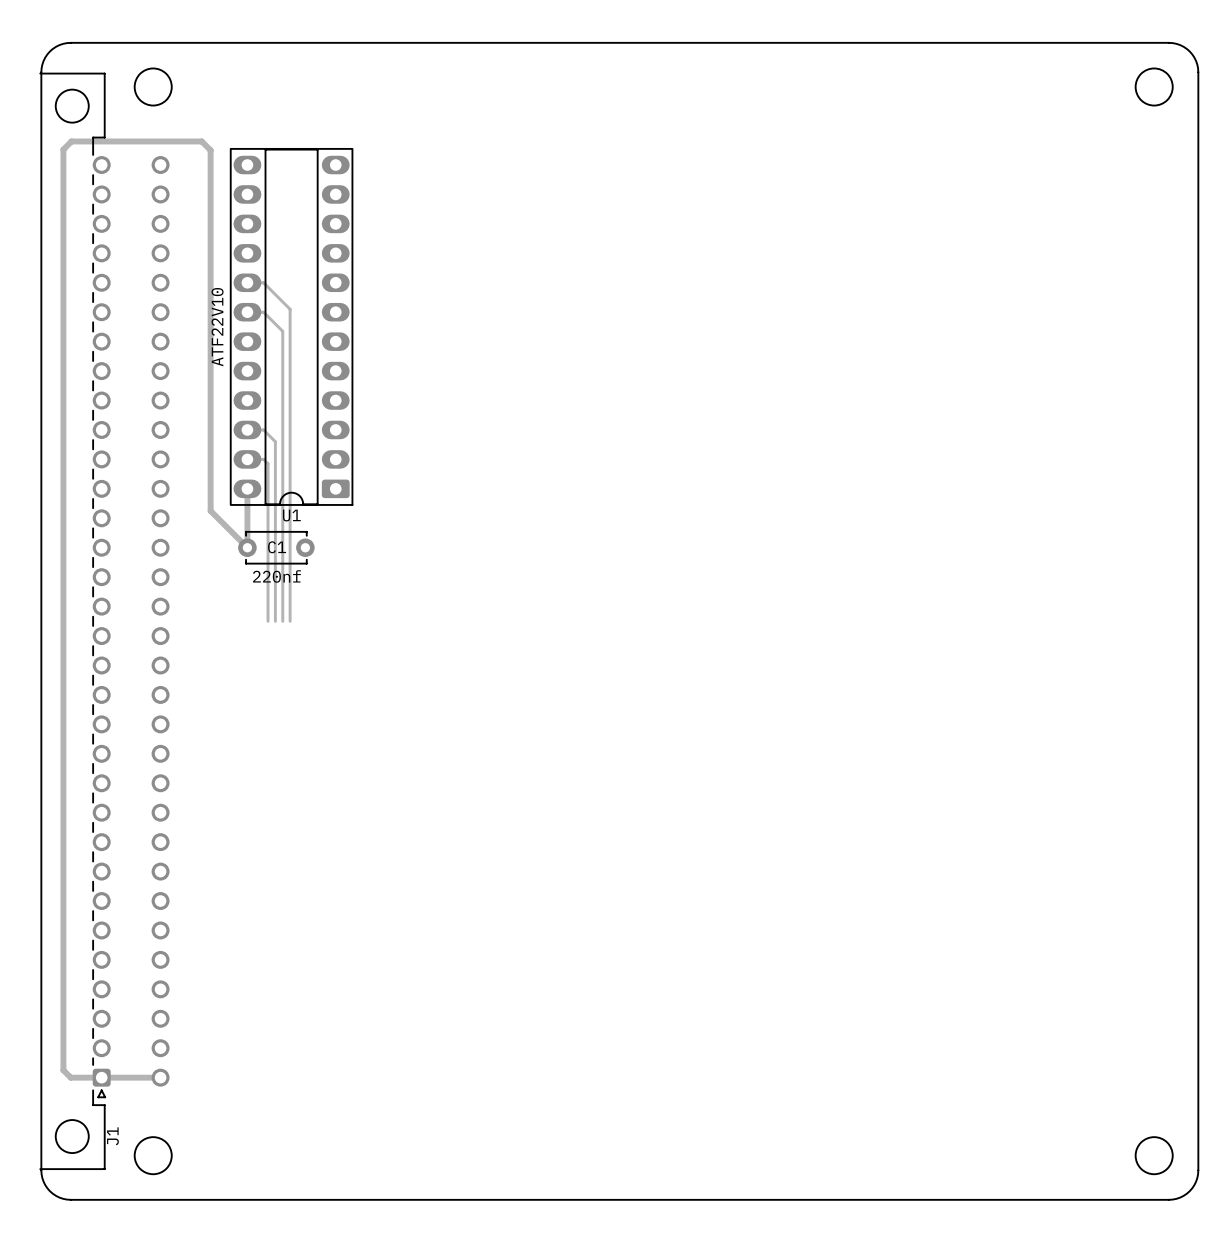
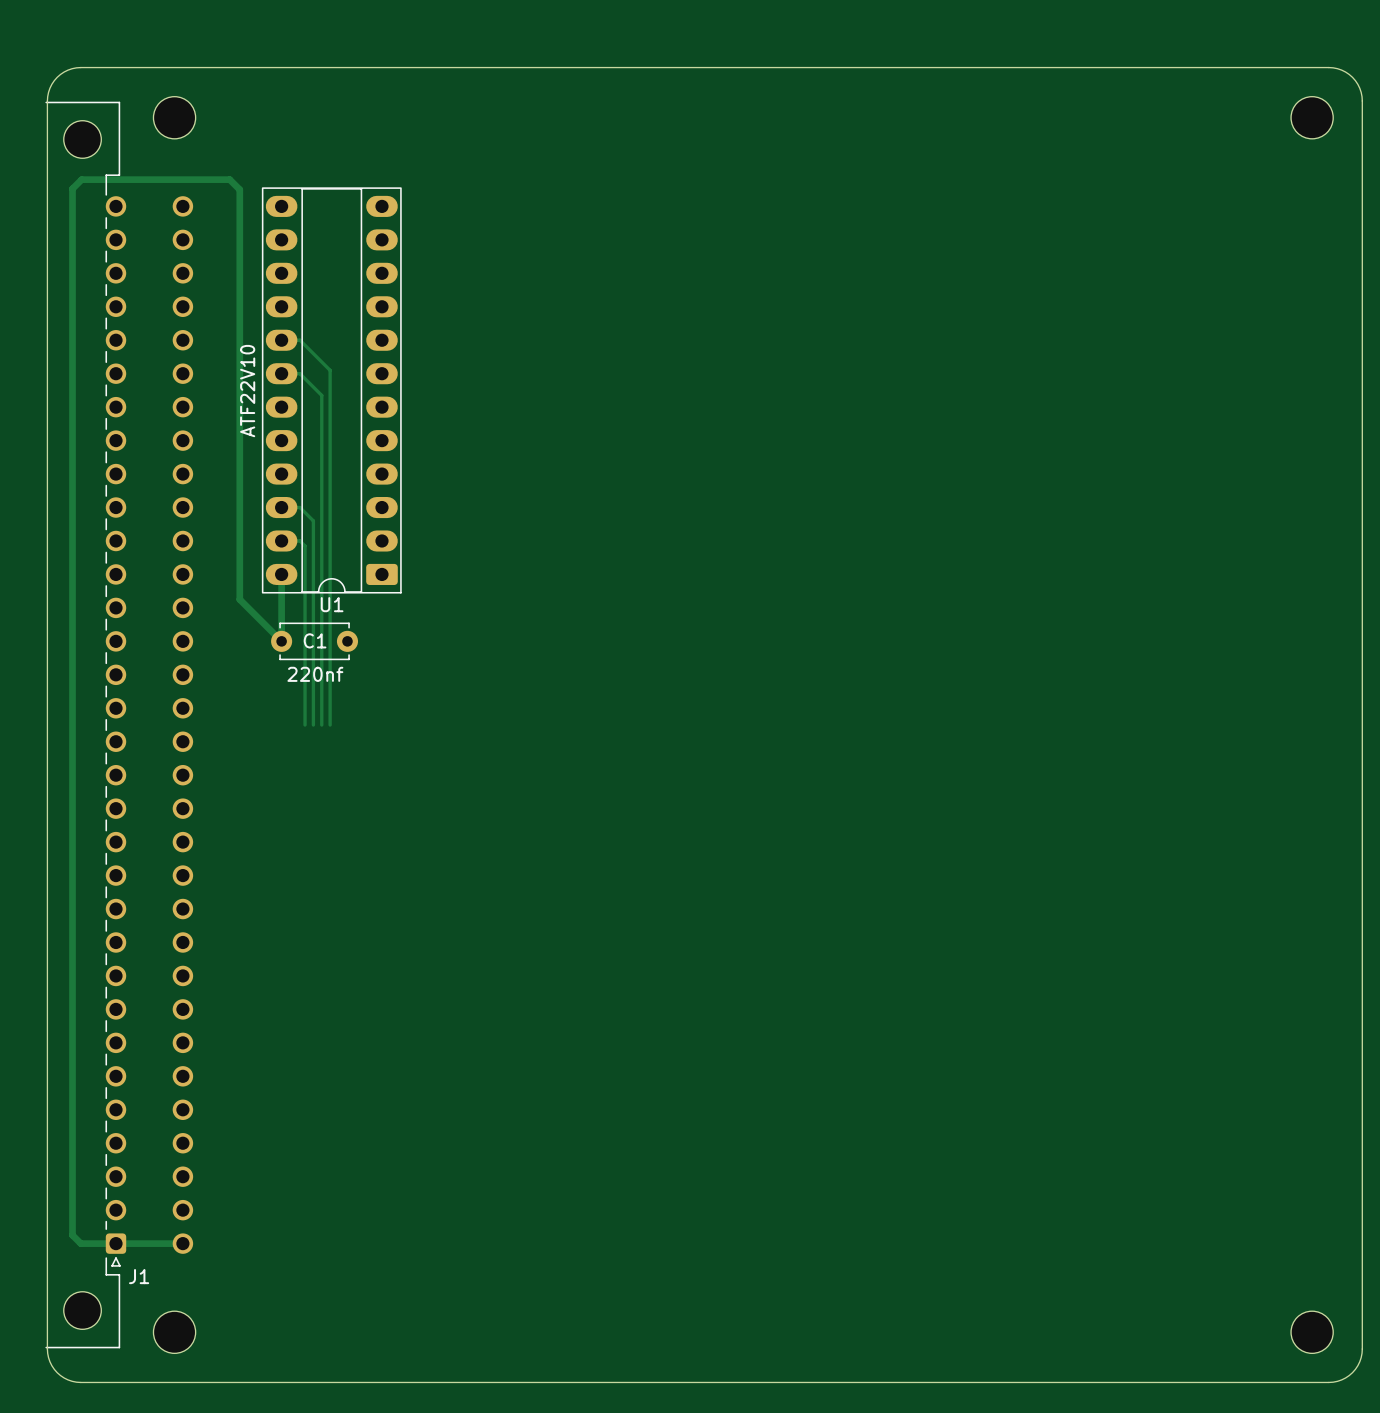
J1 name rotation: 0° (112, 1136) -> 90° clockwise (139, 1276)
J1 name position: J1 (112, 1136) -> J1 (139, 1276)

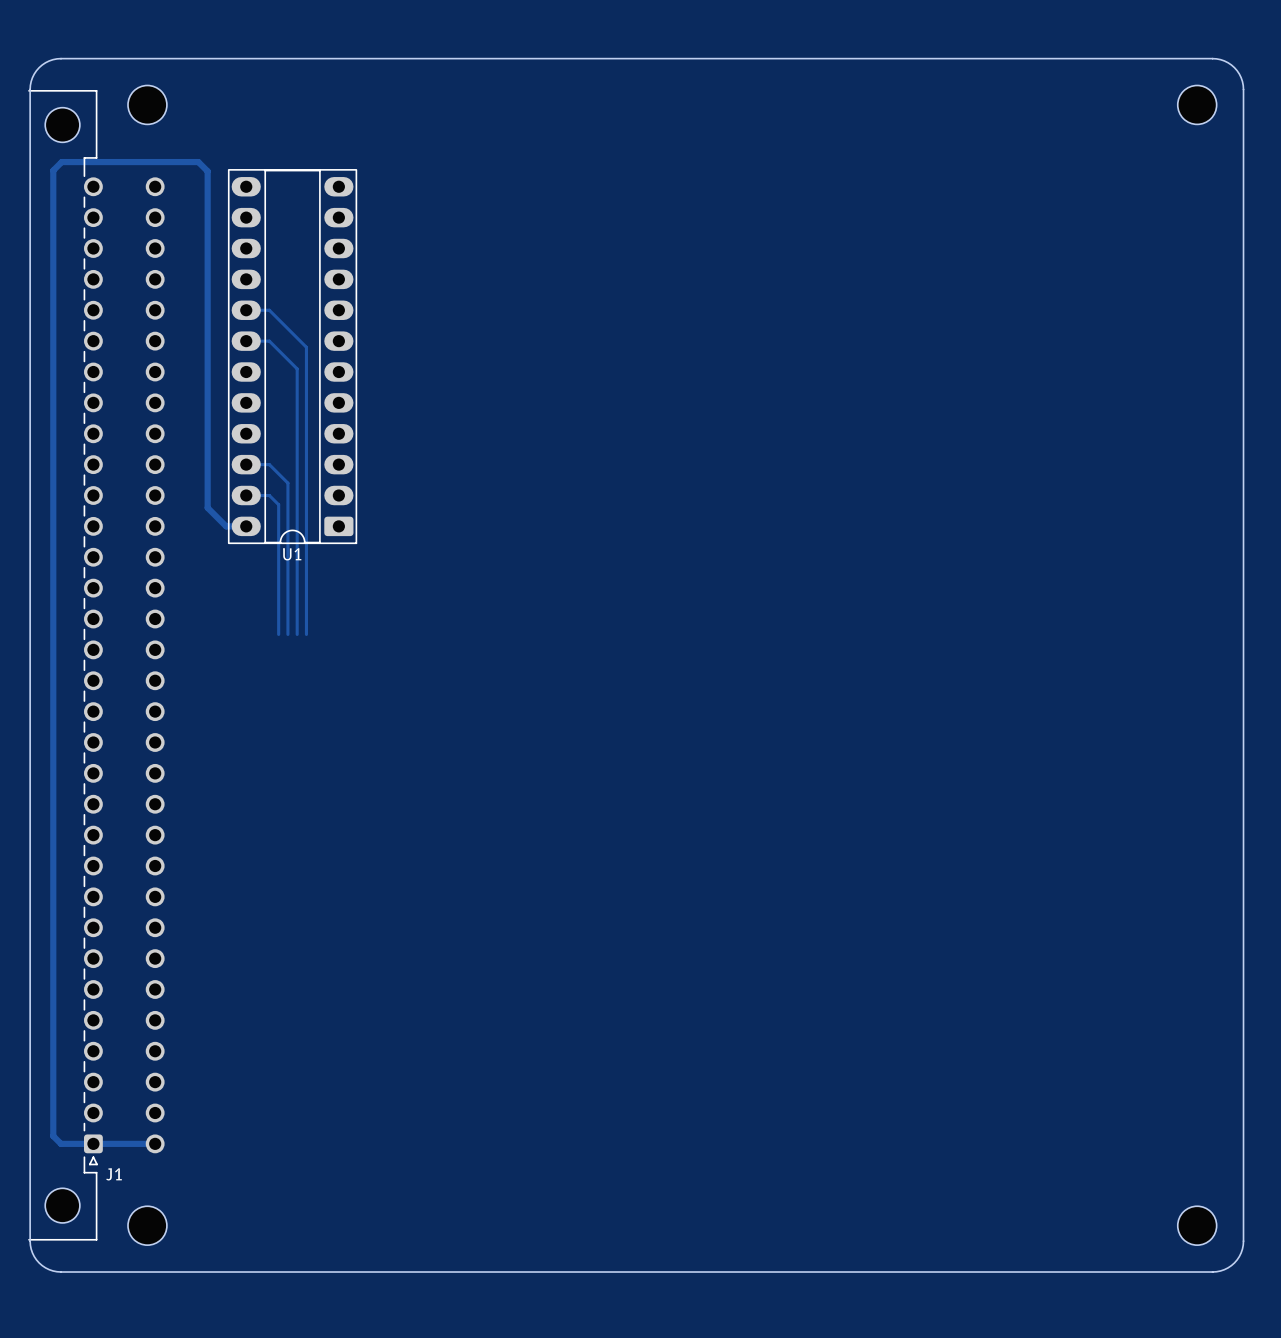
track: (300, 340) (330, 370) (330, 725) -> (263, 310) (269, 310) (306, 347) (306, 634)
track: (300, 373) (321, 395) (321, 725) -> (263, 341) (269, 341) (297, 368) (297, 634)
text: ATF22V10 (247, 391) -> none
track: (300, 507) (313, 520) (313, 725) -> (263, 464) (269, 464) (287, 483) (287, 634)
track: (300, 540) (305, 546) (305, 725) -> (263, 495) (269, 495) (278, 504) (278, 634)
track: (239, 554) (239, 599) (281, 641) (281, 574) -> (207, 507) (226, 526) (246, 526)
C1: (314, 641) -> none
text: 220nf (315, 674) -> none

